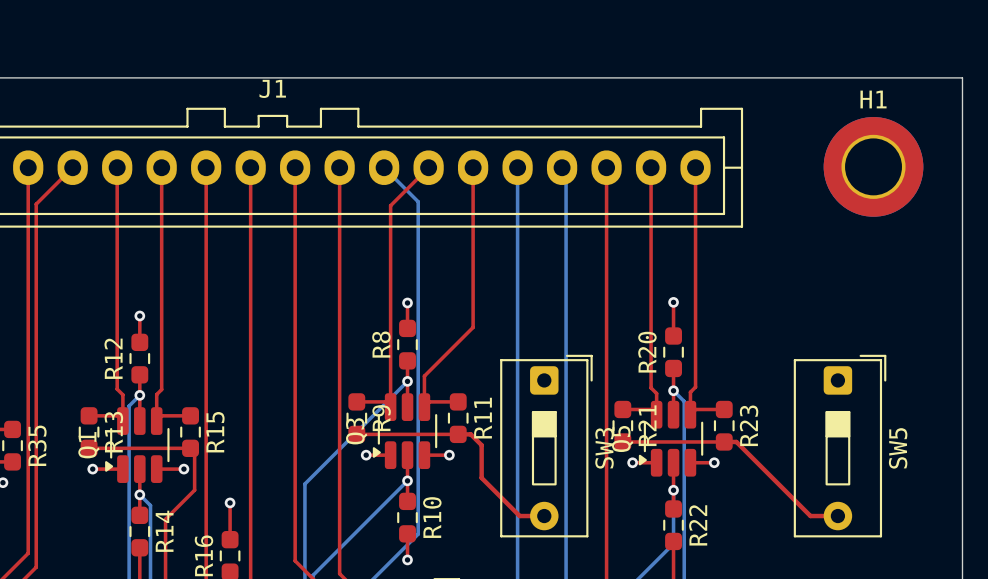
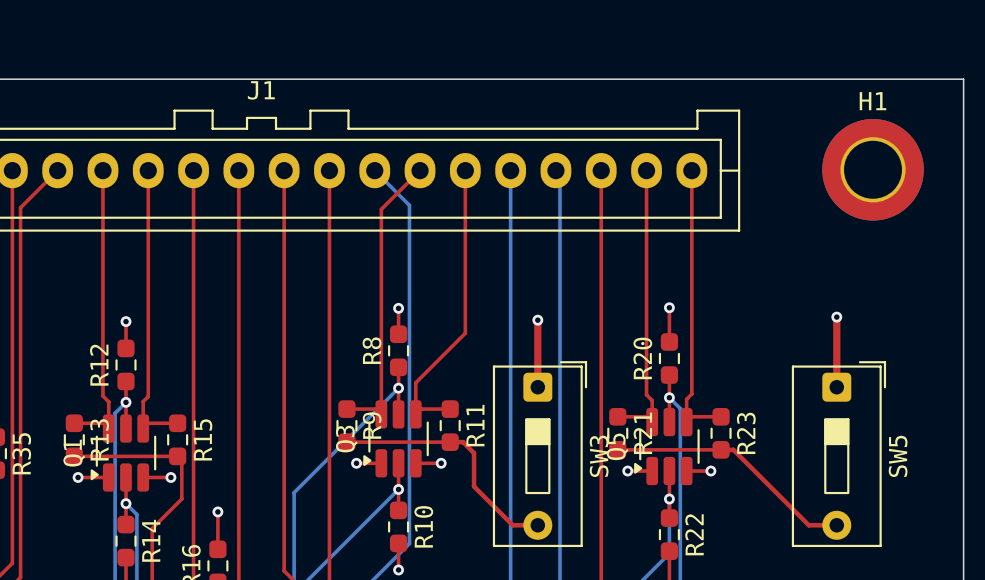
top track: none -> (836, 317) (836, 387)
via: none -> (836, 317)
top track: none -> (537, 320) (537, 387)
via: none -> (537, 320)

